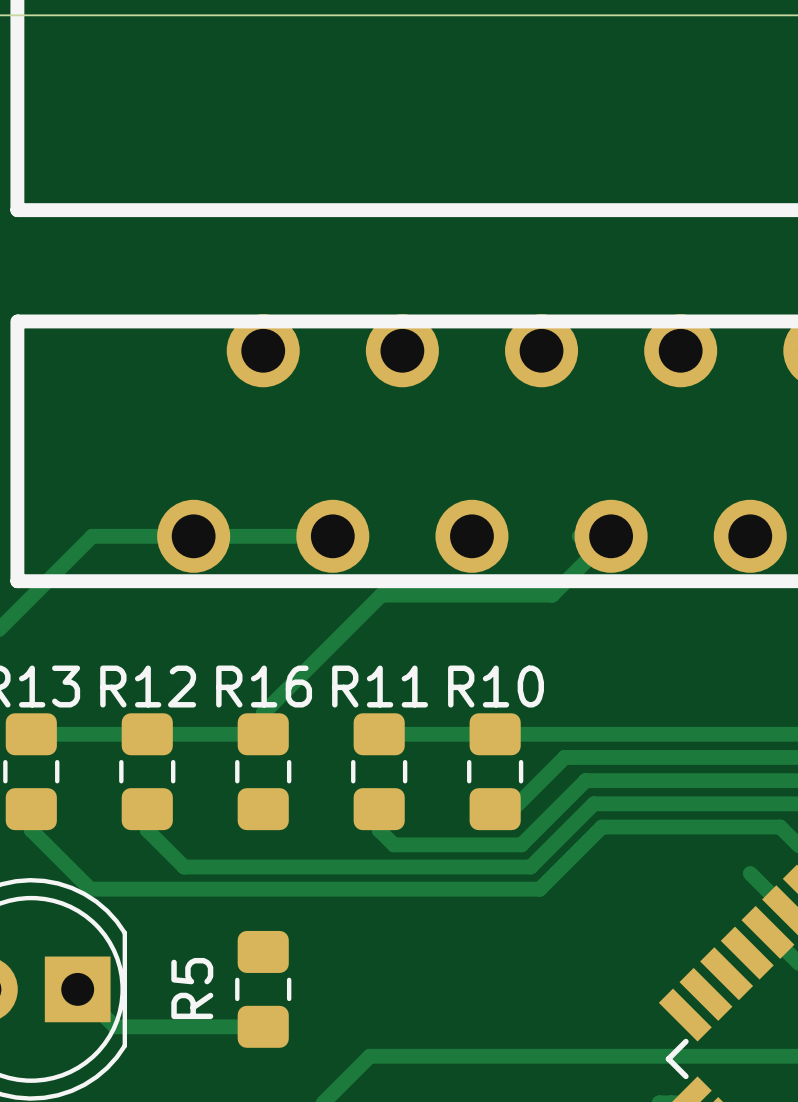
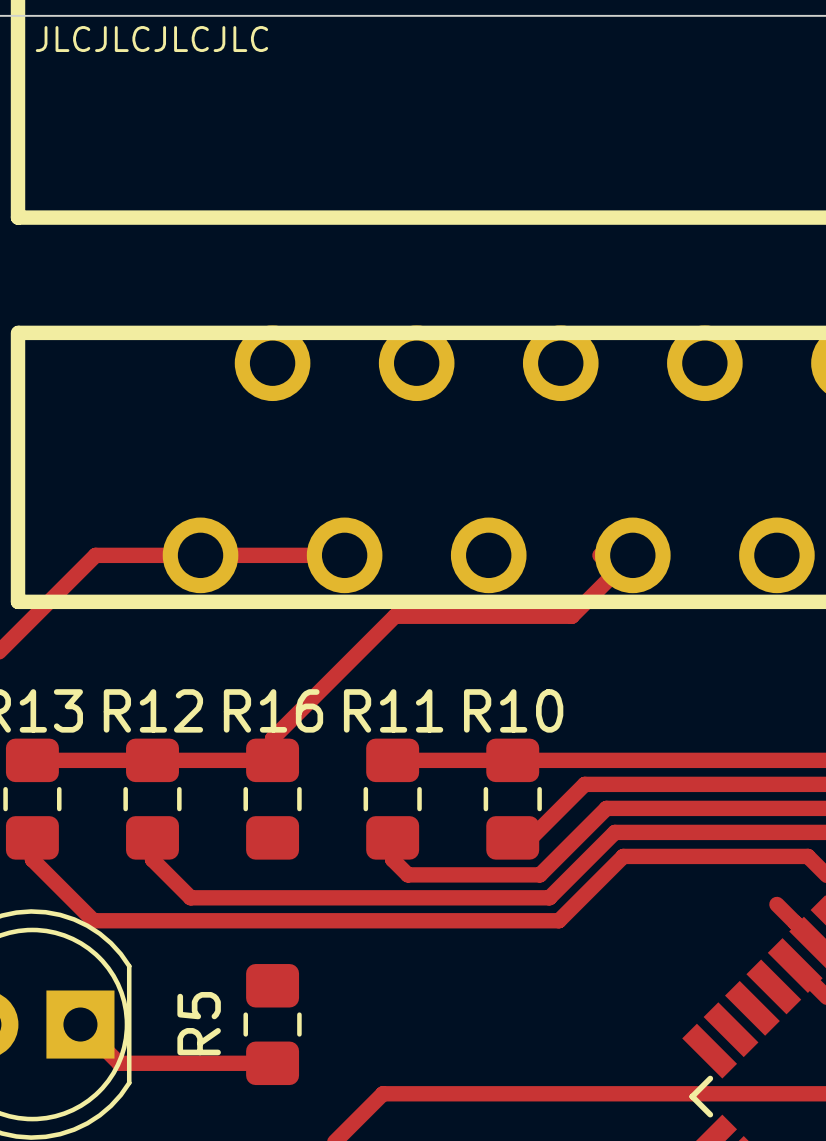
text: none -> JLCJLCJLCJLC (151, 39)

